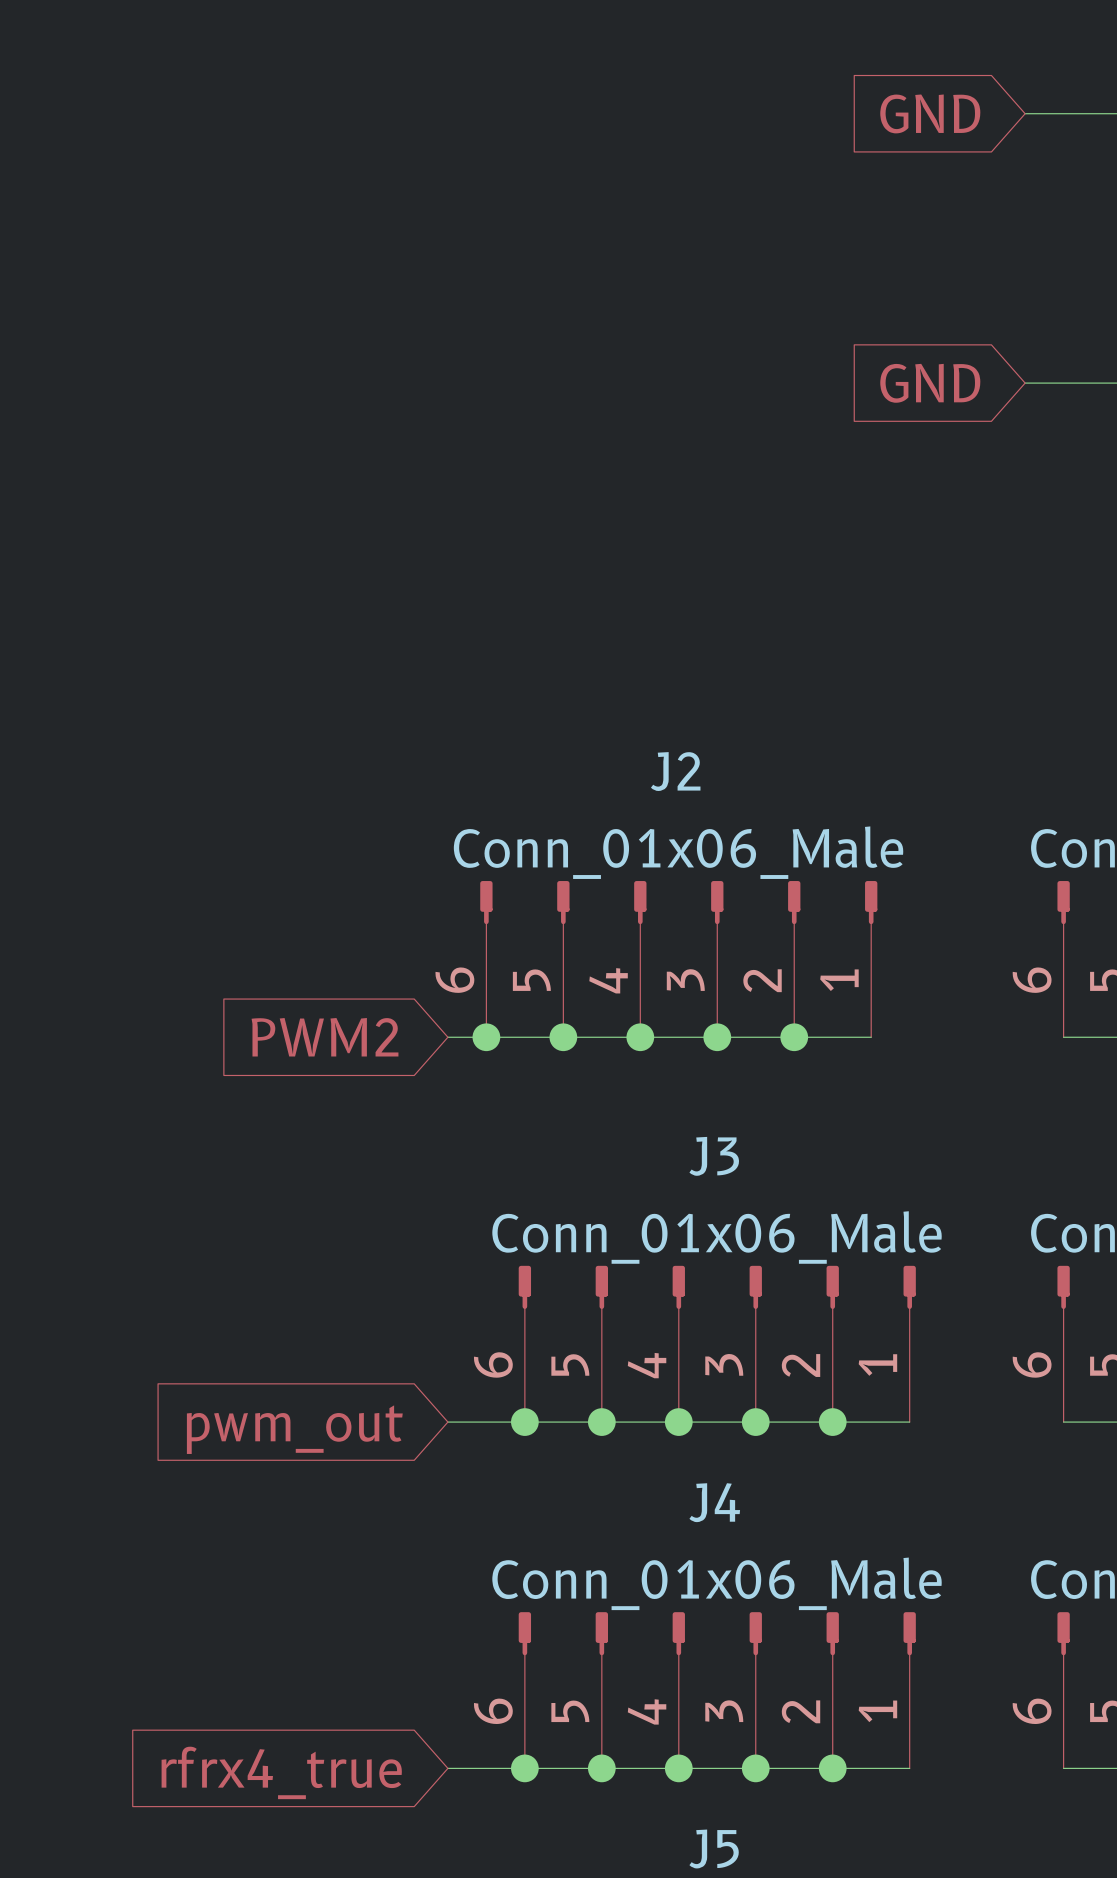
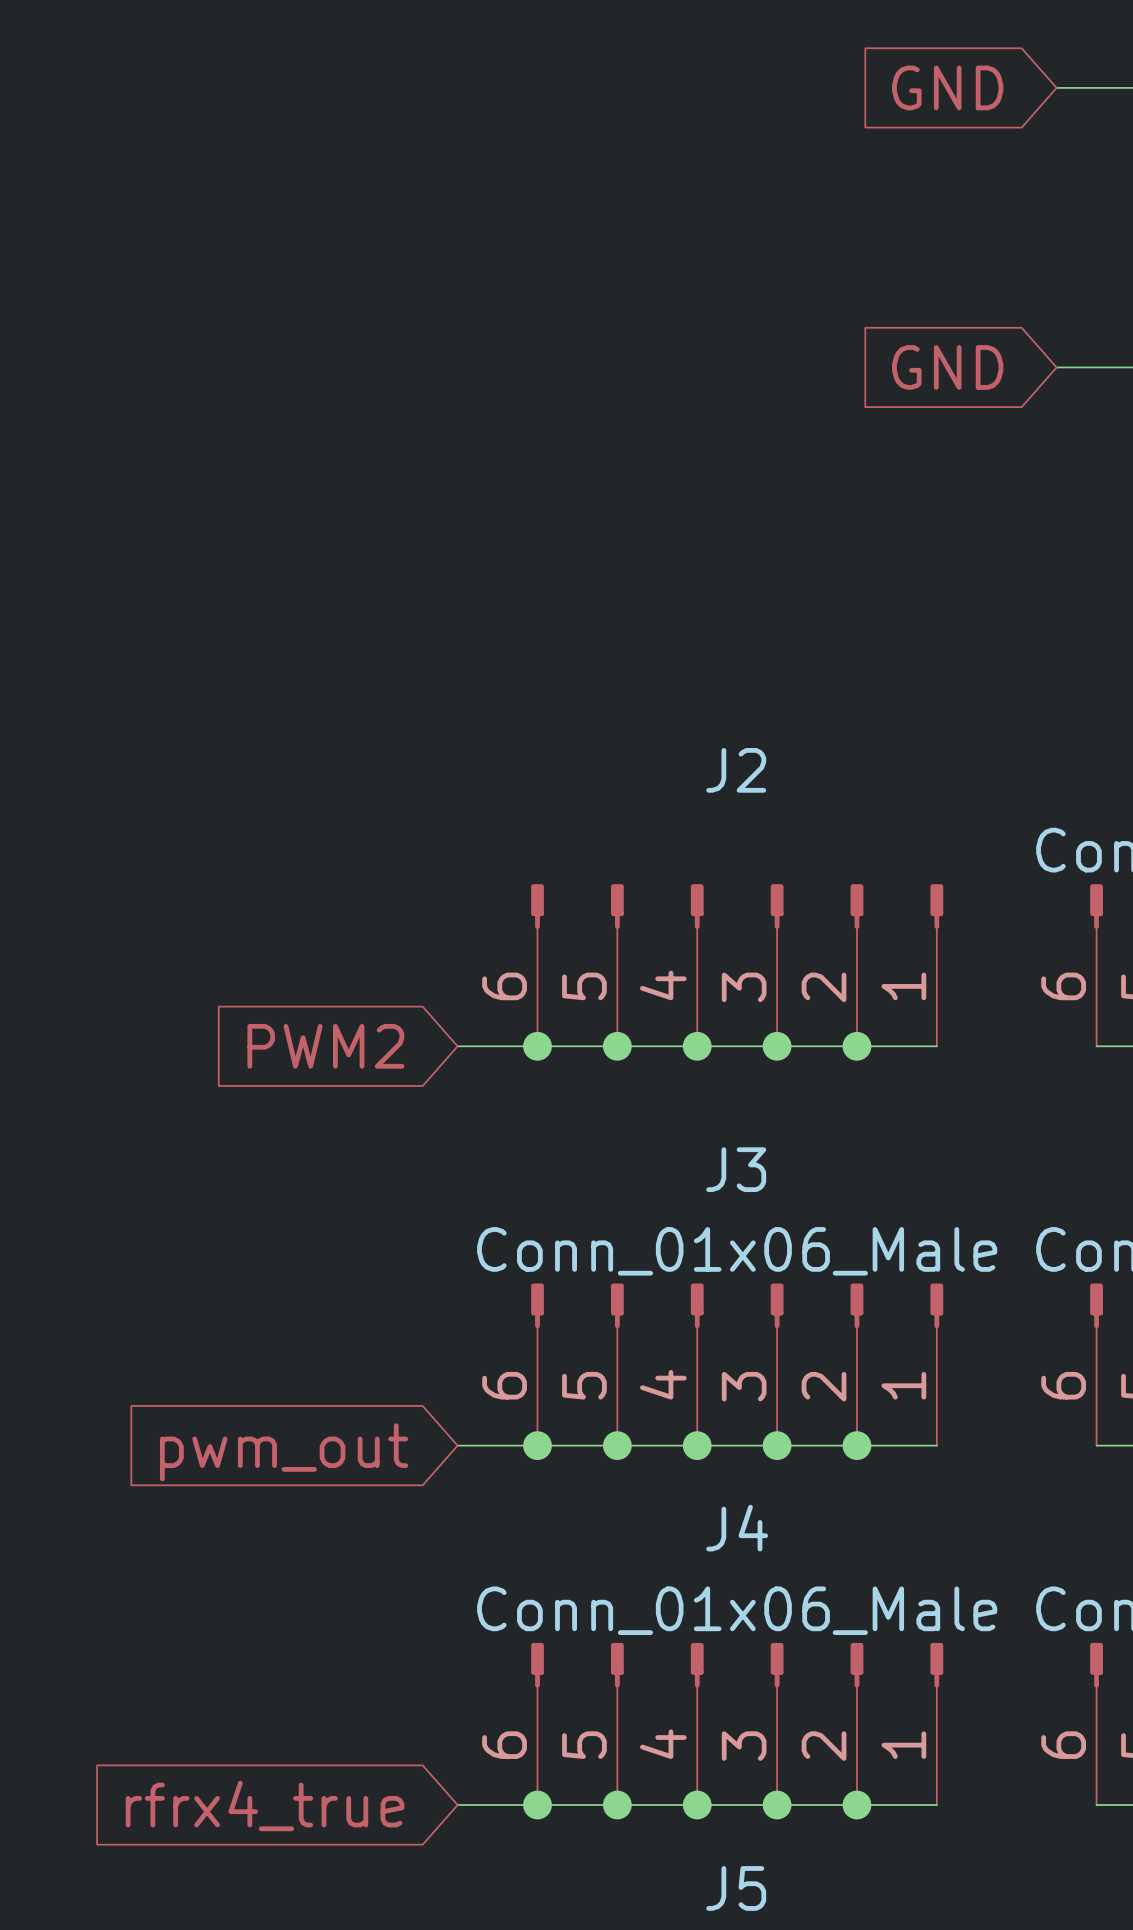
J2 value: Conn_01x06_Male (678, 852) -> none
J2 position: (678, 959) -> (737, 965)
junction: (486, 1037) -> none
junction: none -> (537, 1046)
junction: (563, 1037) -> none
junction: none -> (617, 1046)
junction: (640, 1037) -> none
junction: none -> (697, 1046)
junction: (717, 1037) -> none
junction: none -> (777, 1046)
junction: (794, 1037) -> none
junction: none -> (856, 1046)
wire: none -> (896, 1046) (936, 1046)

